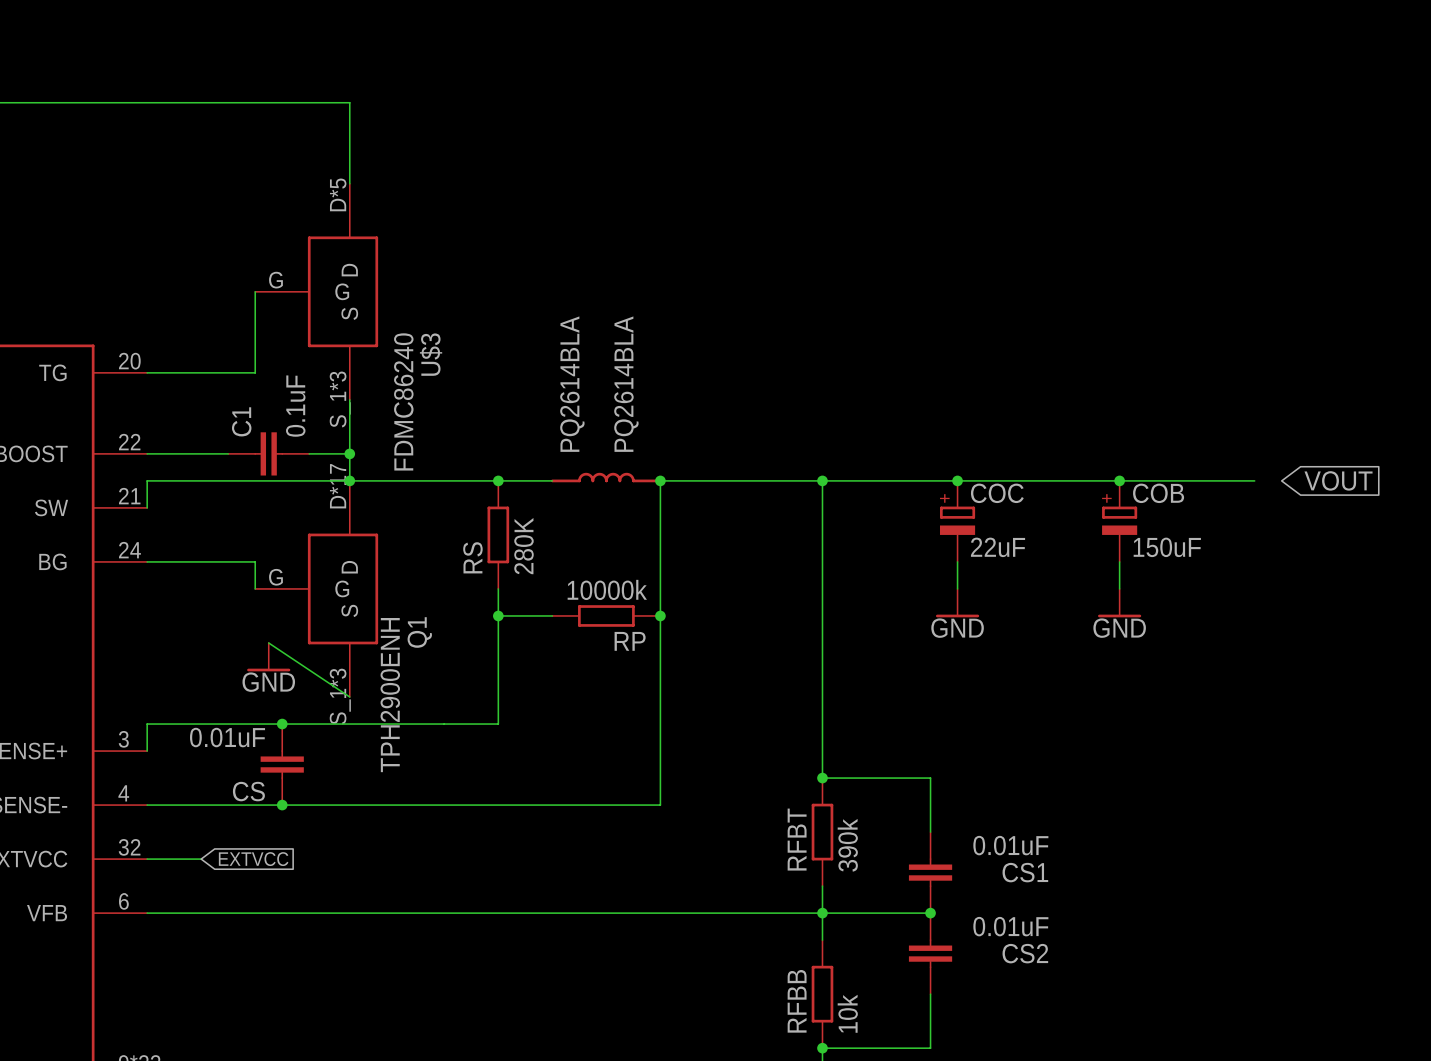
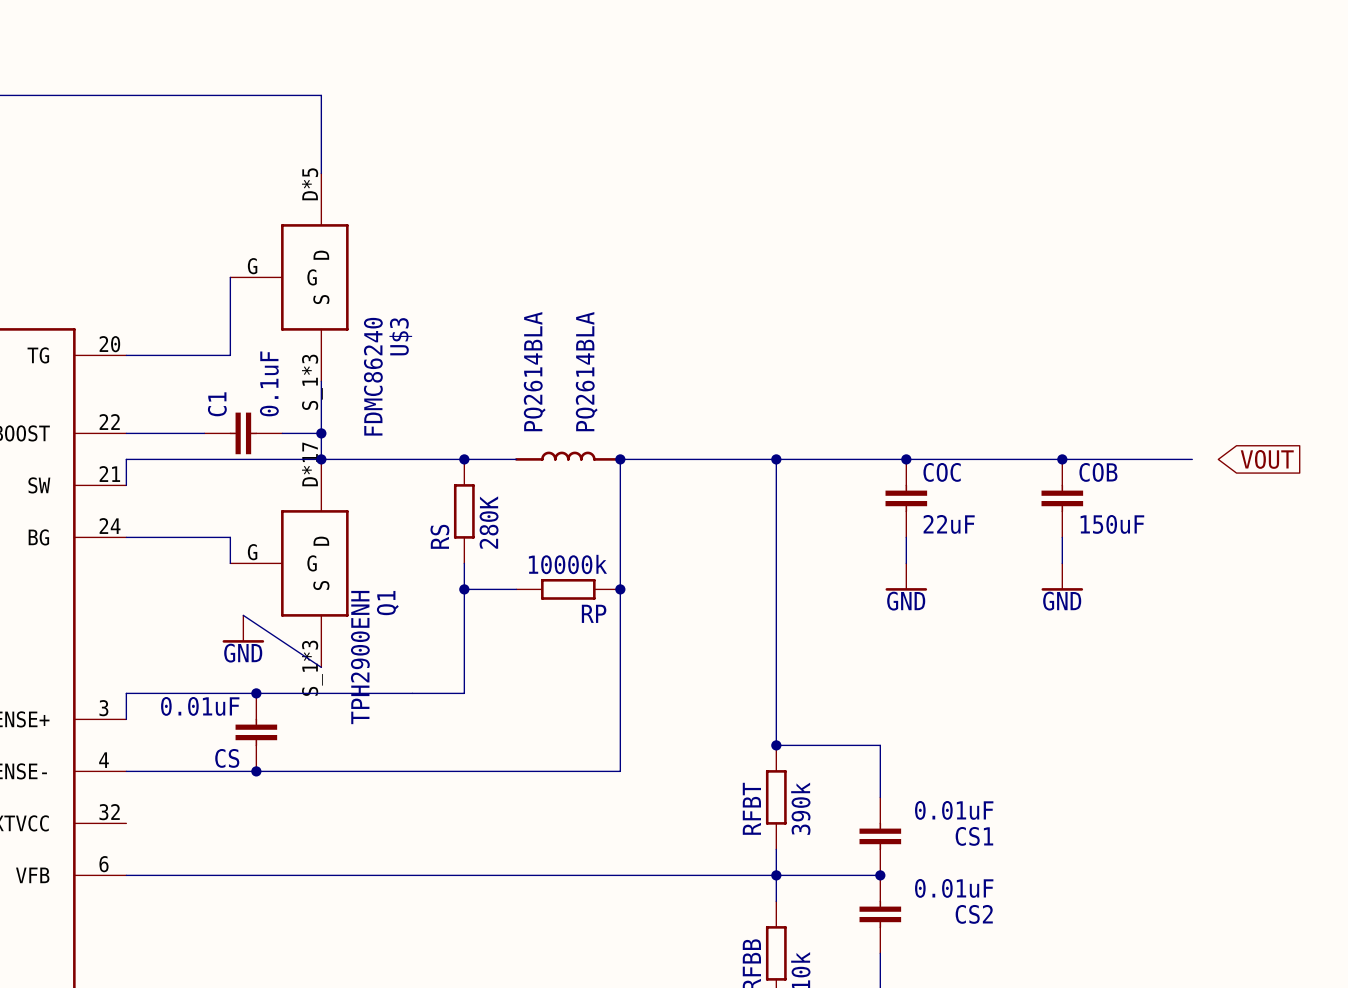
COC symbol: [939, 480, 976, 562] -> [885, 459, 928, 538]
COB symbol: [1102, 480, 1138, 562] -> [1041, 459, 1084, 538]
wire: (147, 859) (201, 859) -> none
global label: EXTVCC (253, 859) -> none

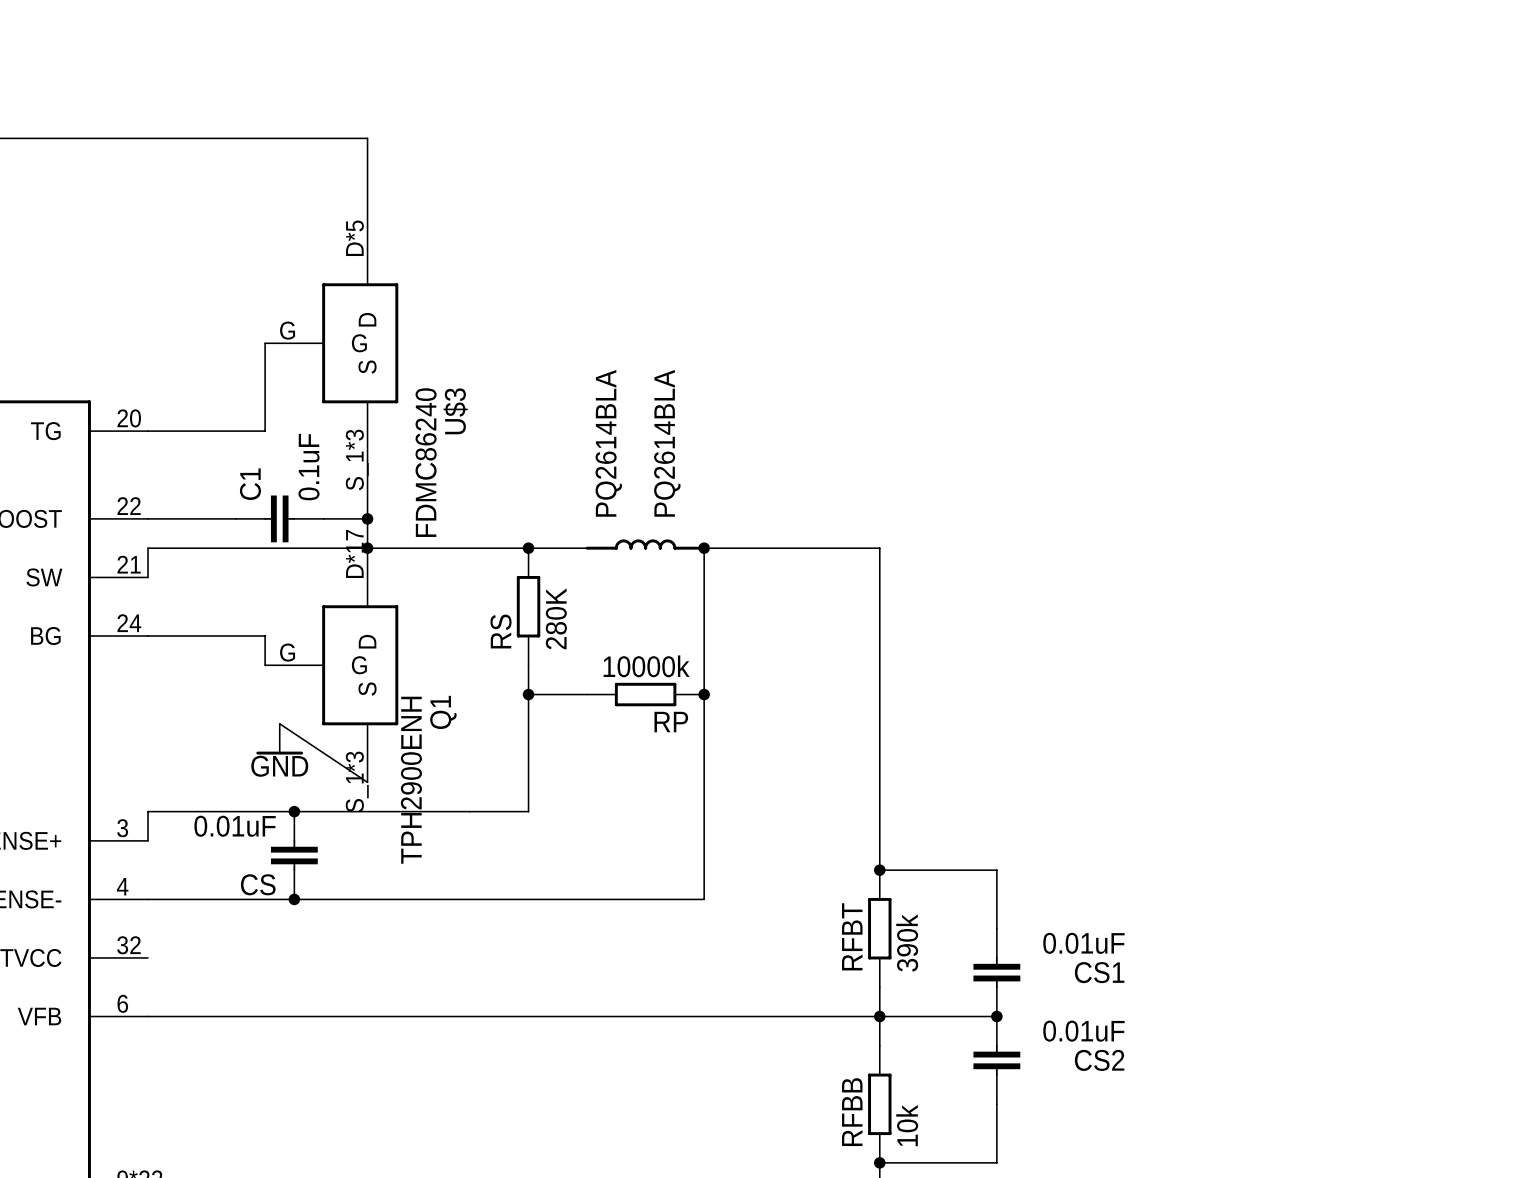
wire: (776, 459) (1192, 459) -> none
junction: (776, 459) -> none
junction: (906, 459) -> none
junction: (1062, 459) -> none
global label: VOUT (1267, 459) -> none
COC: 22uF (906, 498) -> none
COB: 150uF (1062, 498) -> none
wire: (906, 537) (906, 563) -> none
wire: (1062, 537) (1062, 563) -> none
power symbol: GND (906, 577) -> none
power symbol: GND (1062, 577) -> none

